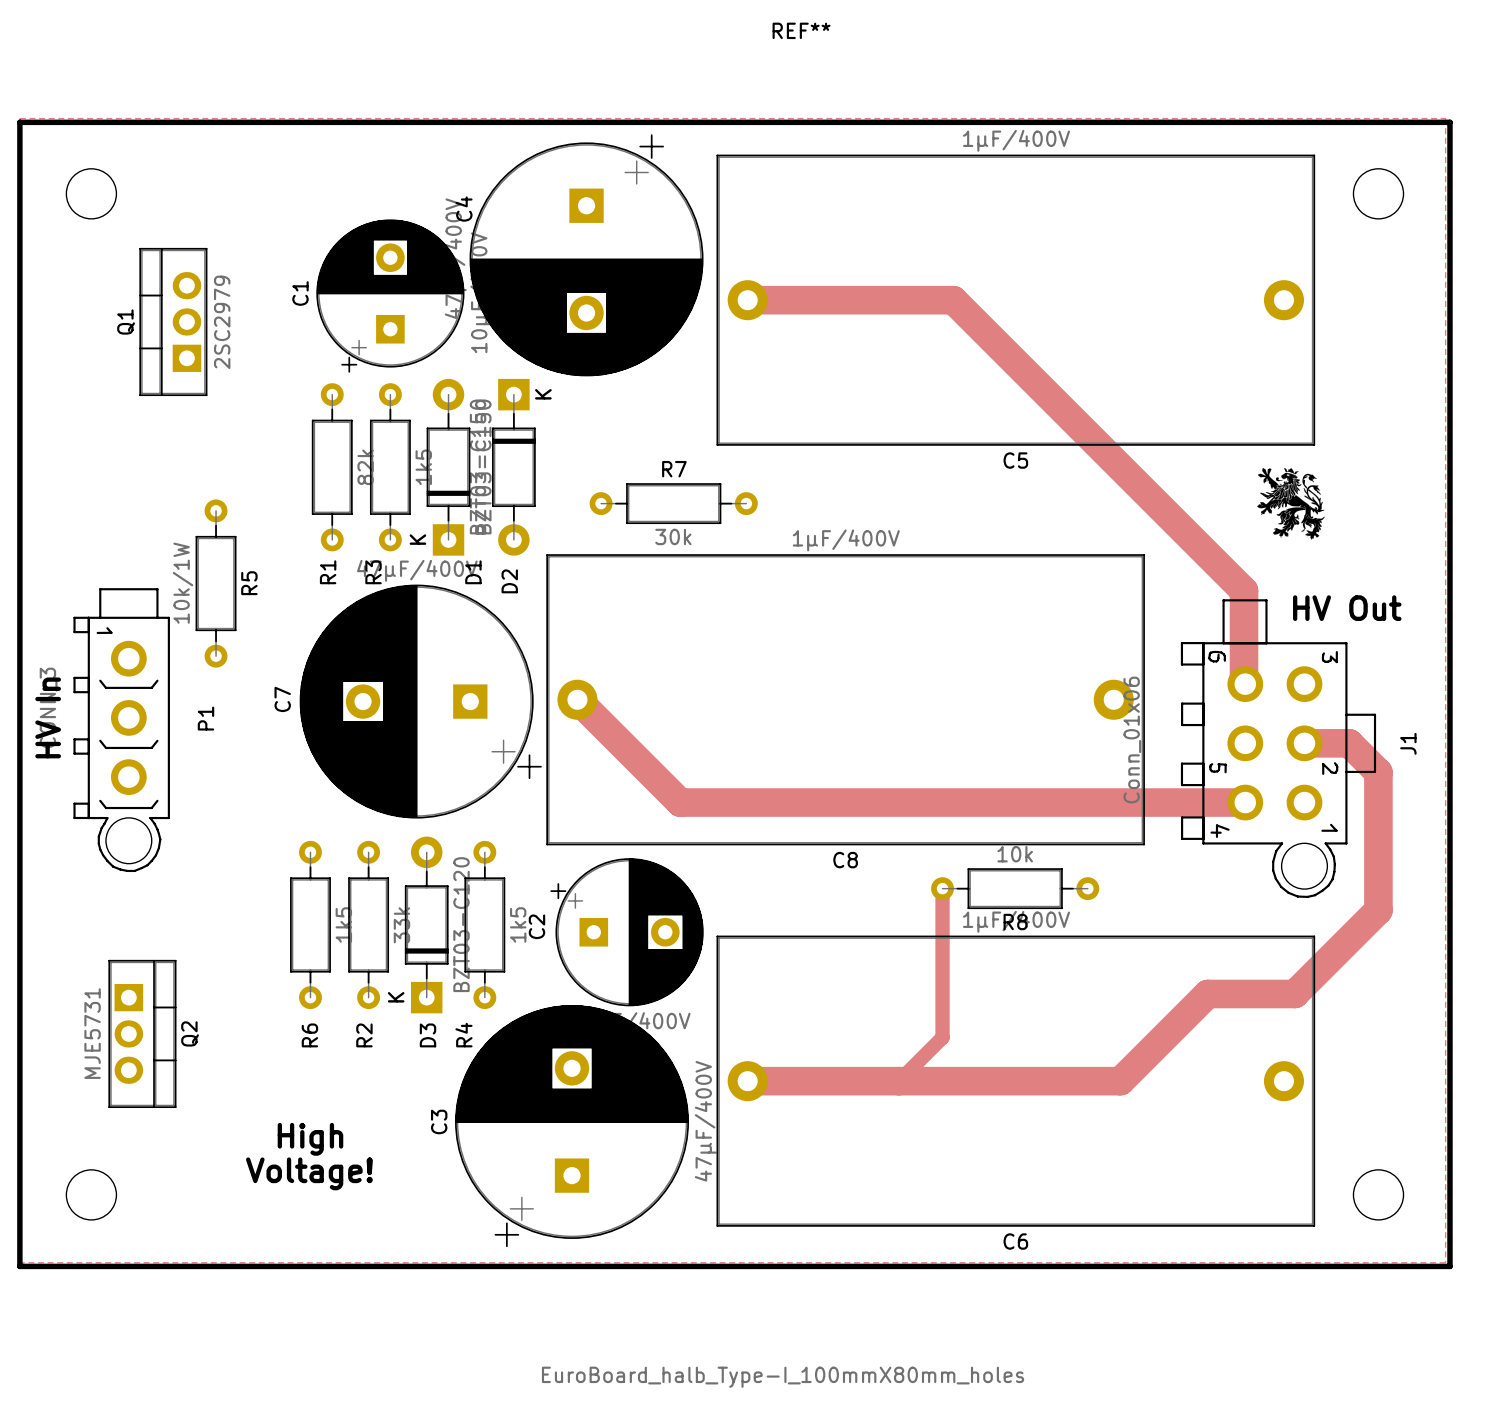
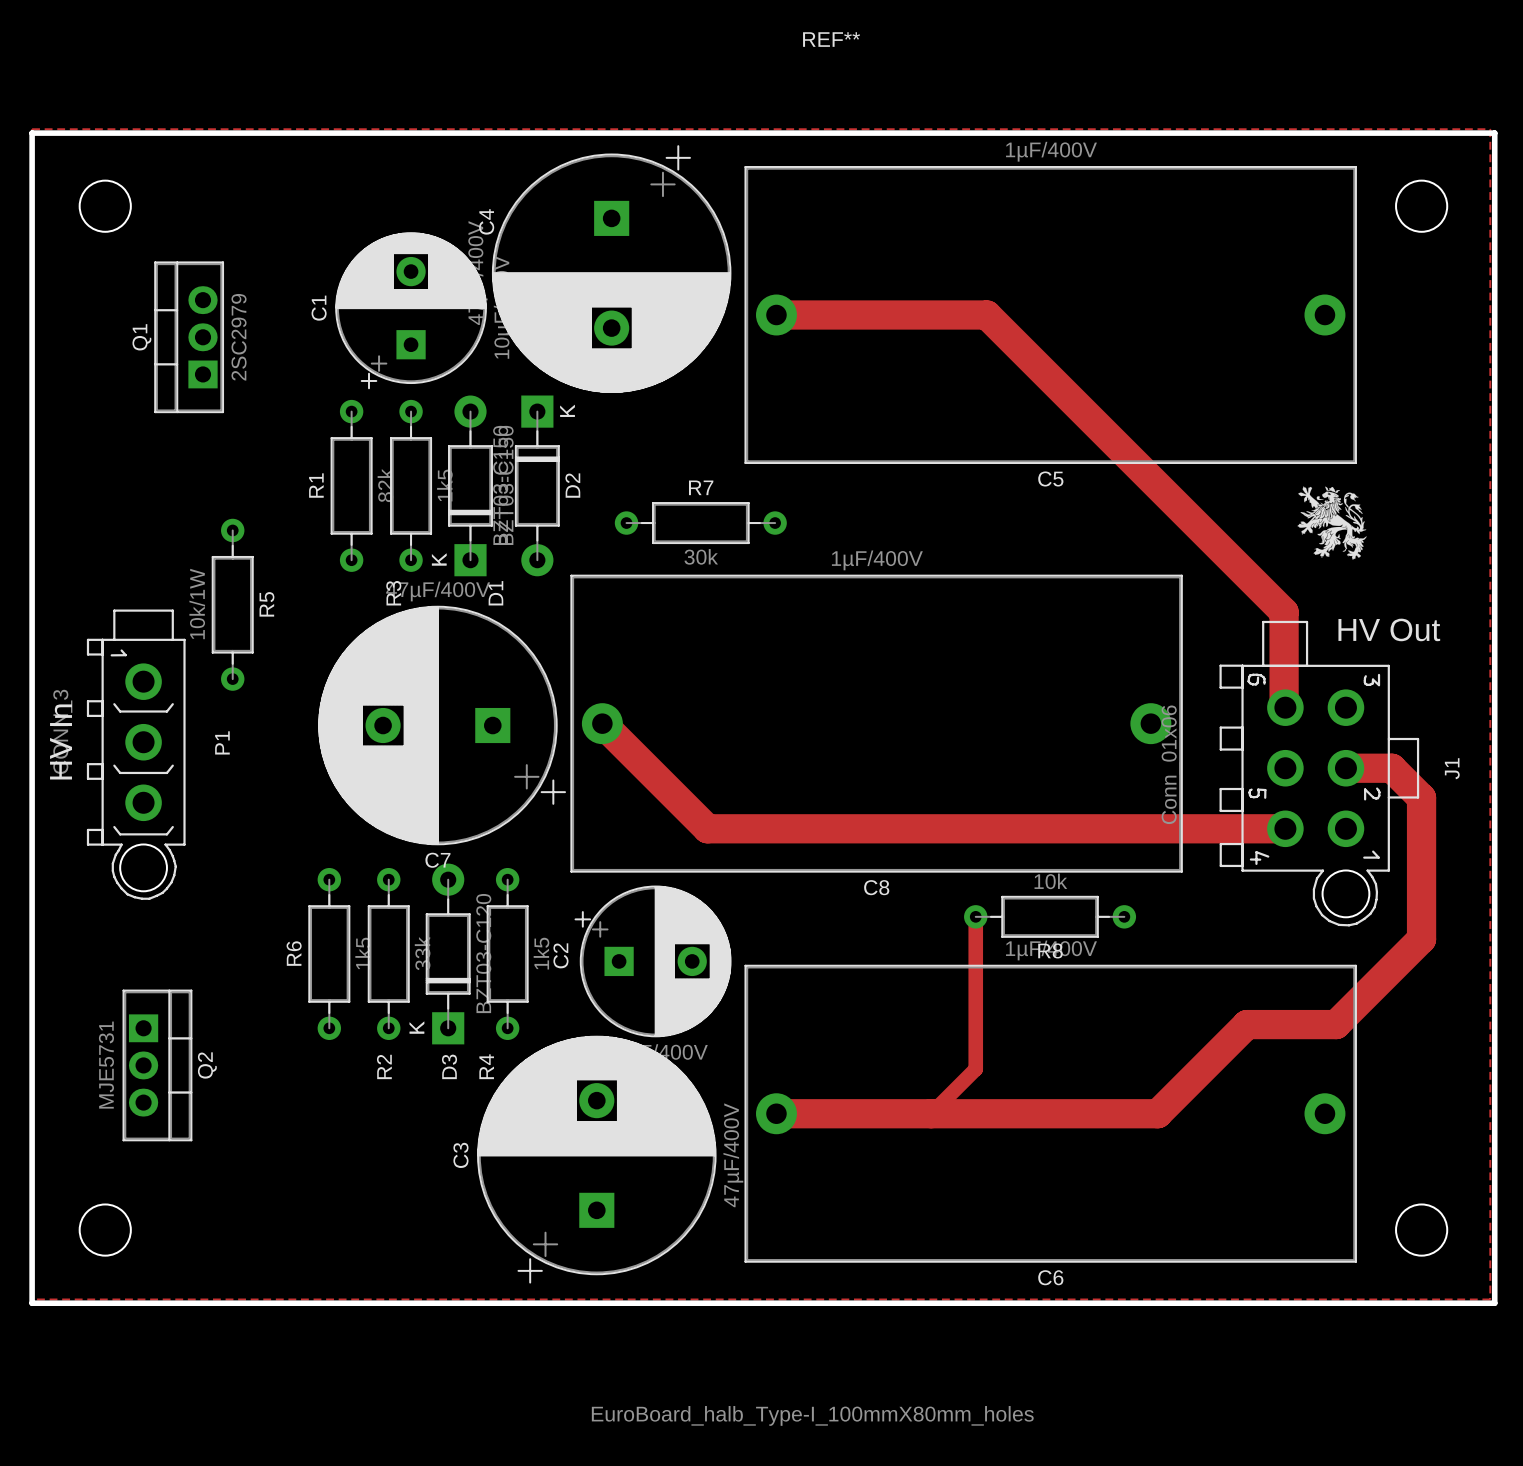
R1 name position: R1 (328, 572) -> R1 (316, 485)
D2 name position: D2 (509, 581) -> D2 (572, 485)
C7 name rotation: 0° (282, 699) -> 90° clockwise (437, 860)
C7 name position: C7 (282, 699) -> C7 (437, 860)
R6 name position: R6 (309, 1035) -> R6 (294, 953)
text: High (310, 1139) -> none
text: Voltage! (309, 1173) -> none

